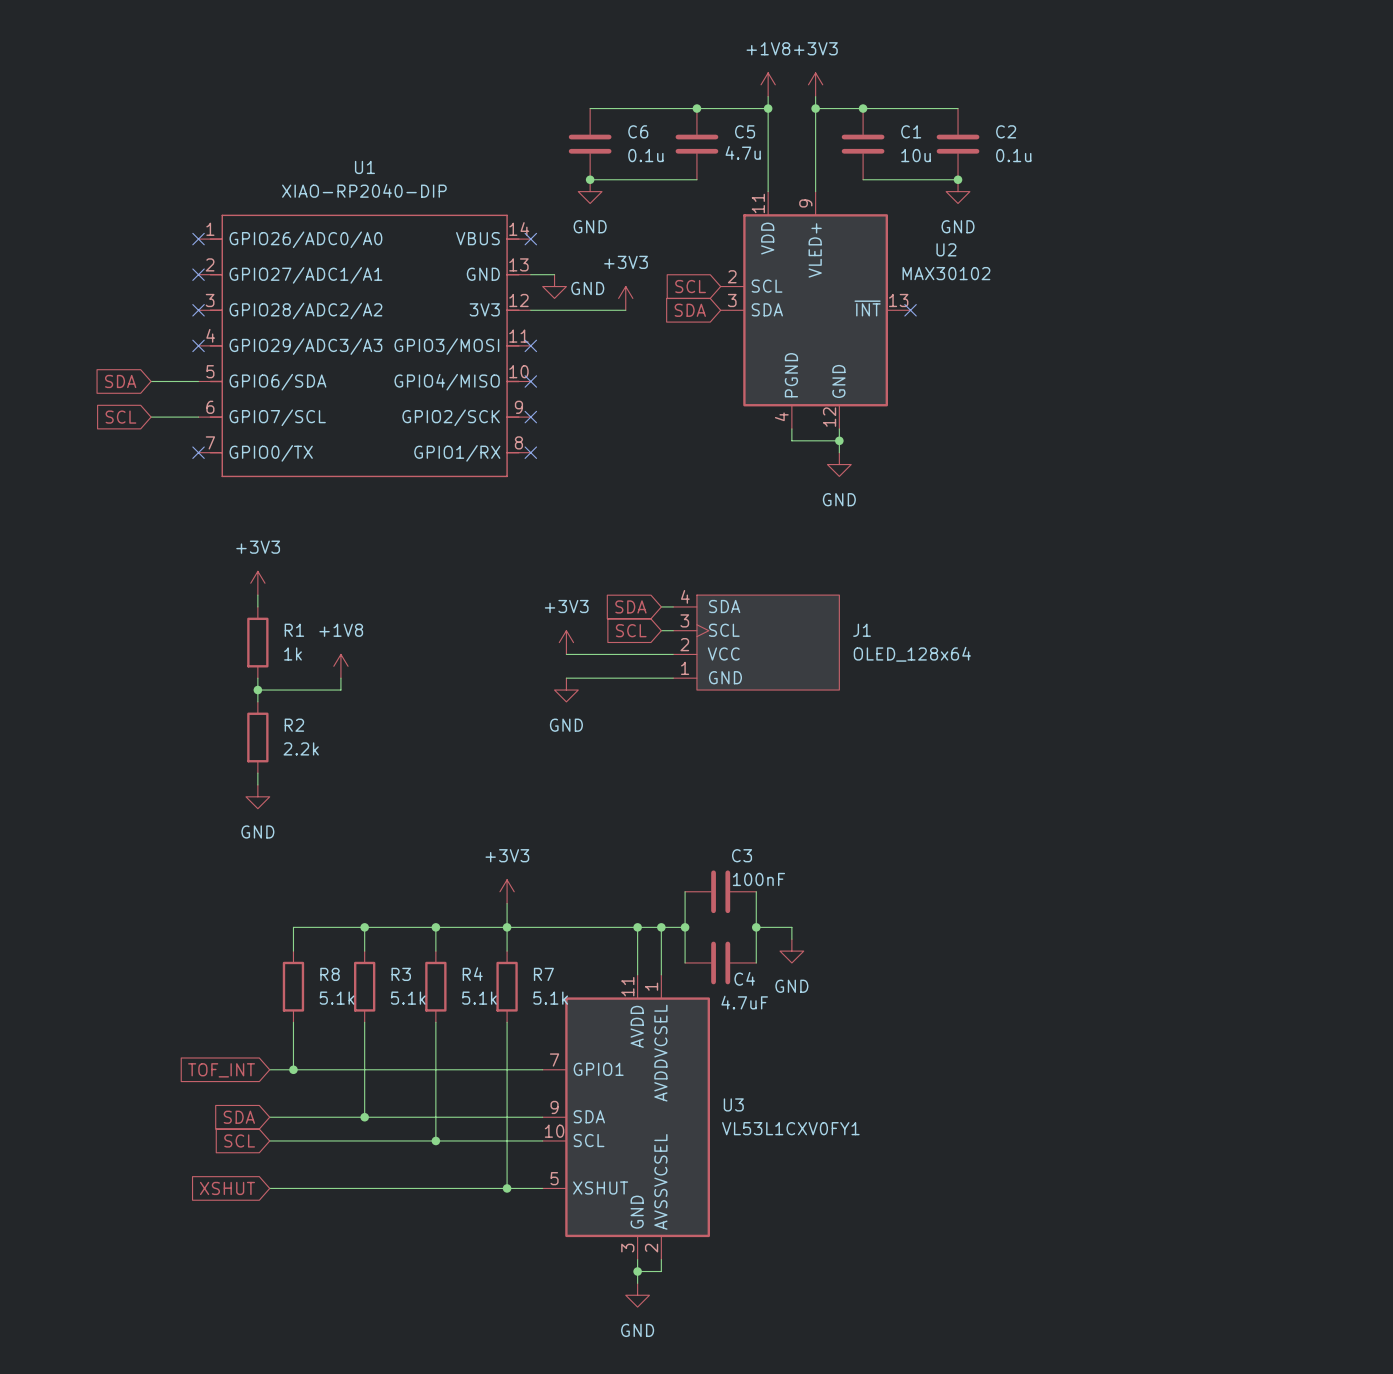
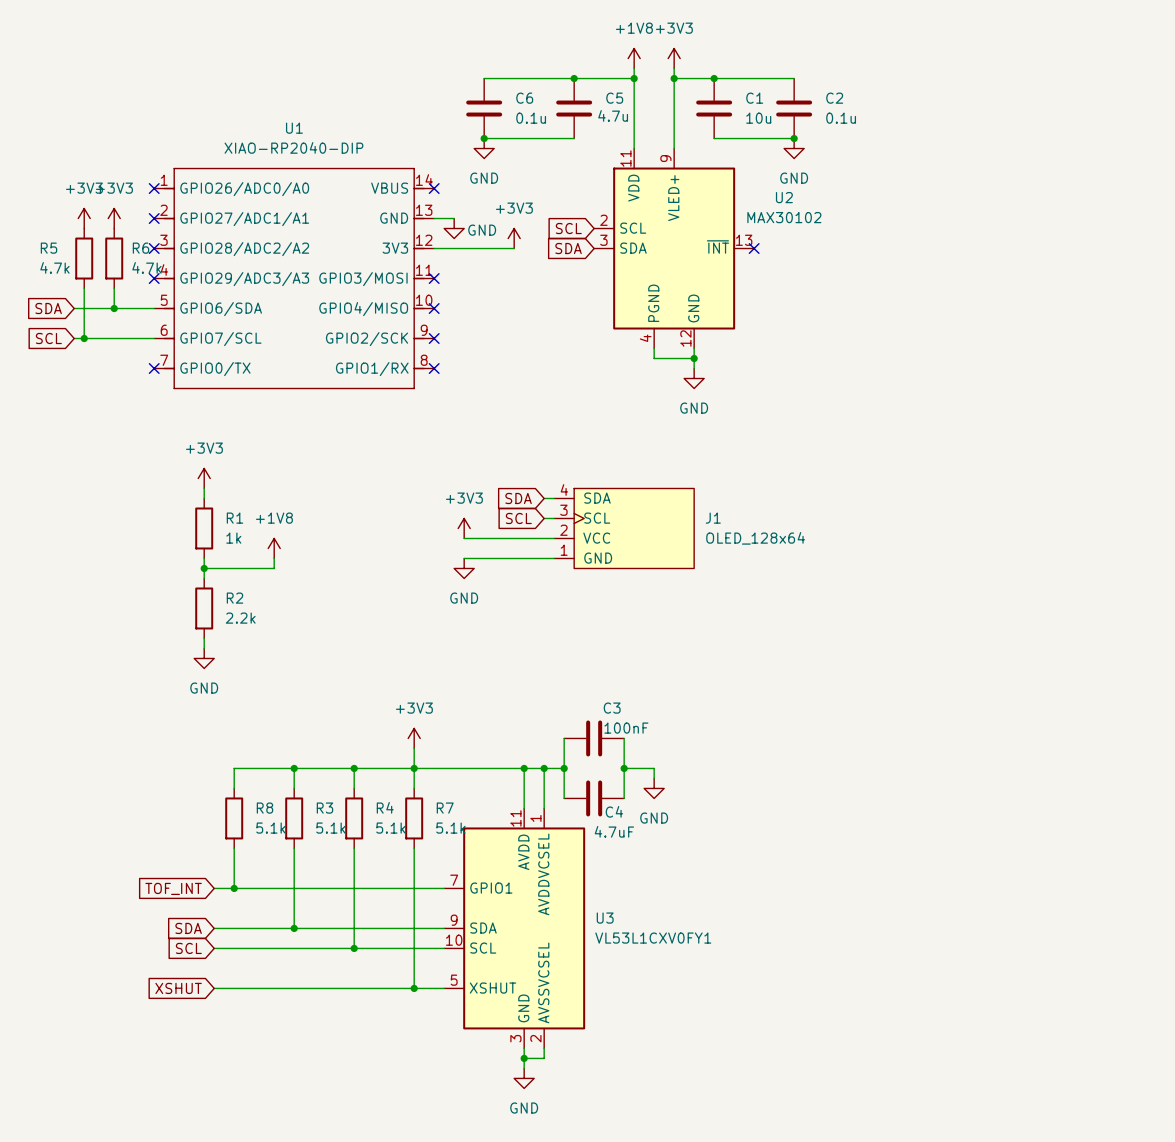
power symbol: none -> +3V3 (84, 218)
power symbol: none -> +3V3 (114, 218)
R5: none -> 4.7k (84, 258)
R6: none -> 4.7k (114, 258)
wire: none -> (84, 288) (84, 338)
wire: none -> (114, 288) (114, 308) (74, 308)
global label position: SDA (120, 381) -> SDA (48, 308)
junction: none -> (114, 308)
wire: none -> (74, 338) (114, 338)
junction: none -> (84, 338)
global label position: SCL (120, 417) -> SCL (48, 338)

